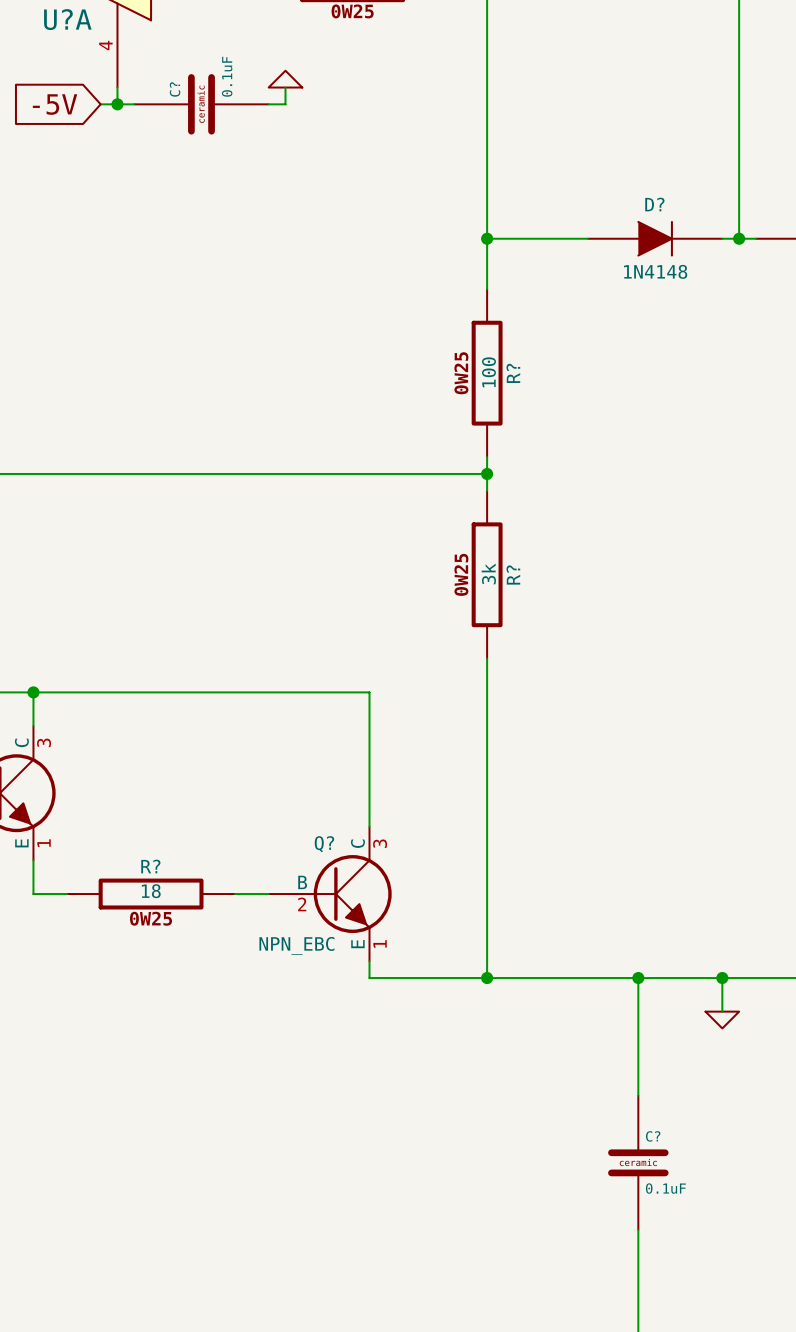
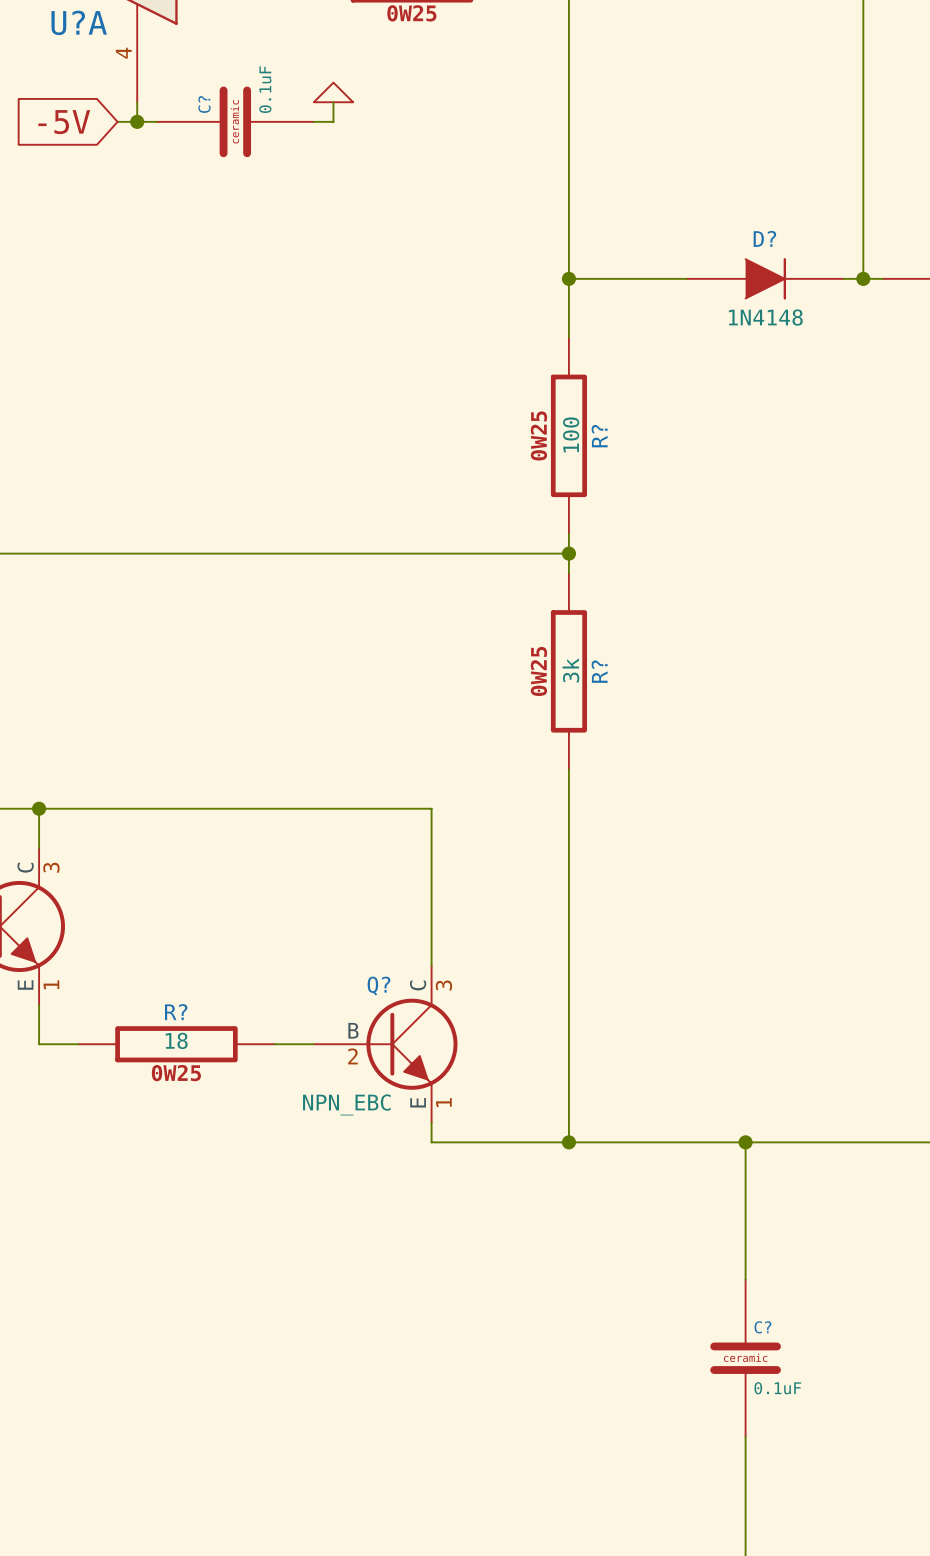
wire: (722, 978) (722, 1011) -> none
junction: (722, 978) -> none
power symbol: (722, 1020) -> none

